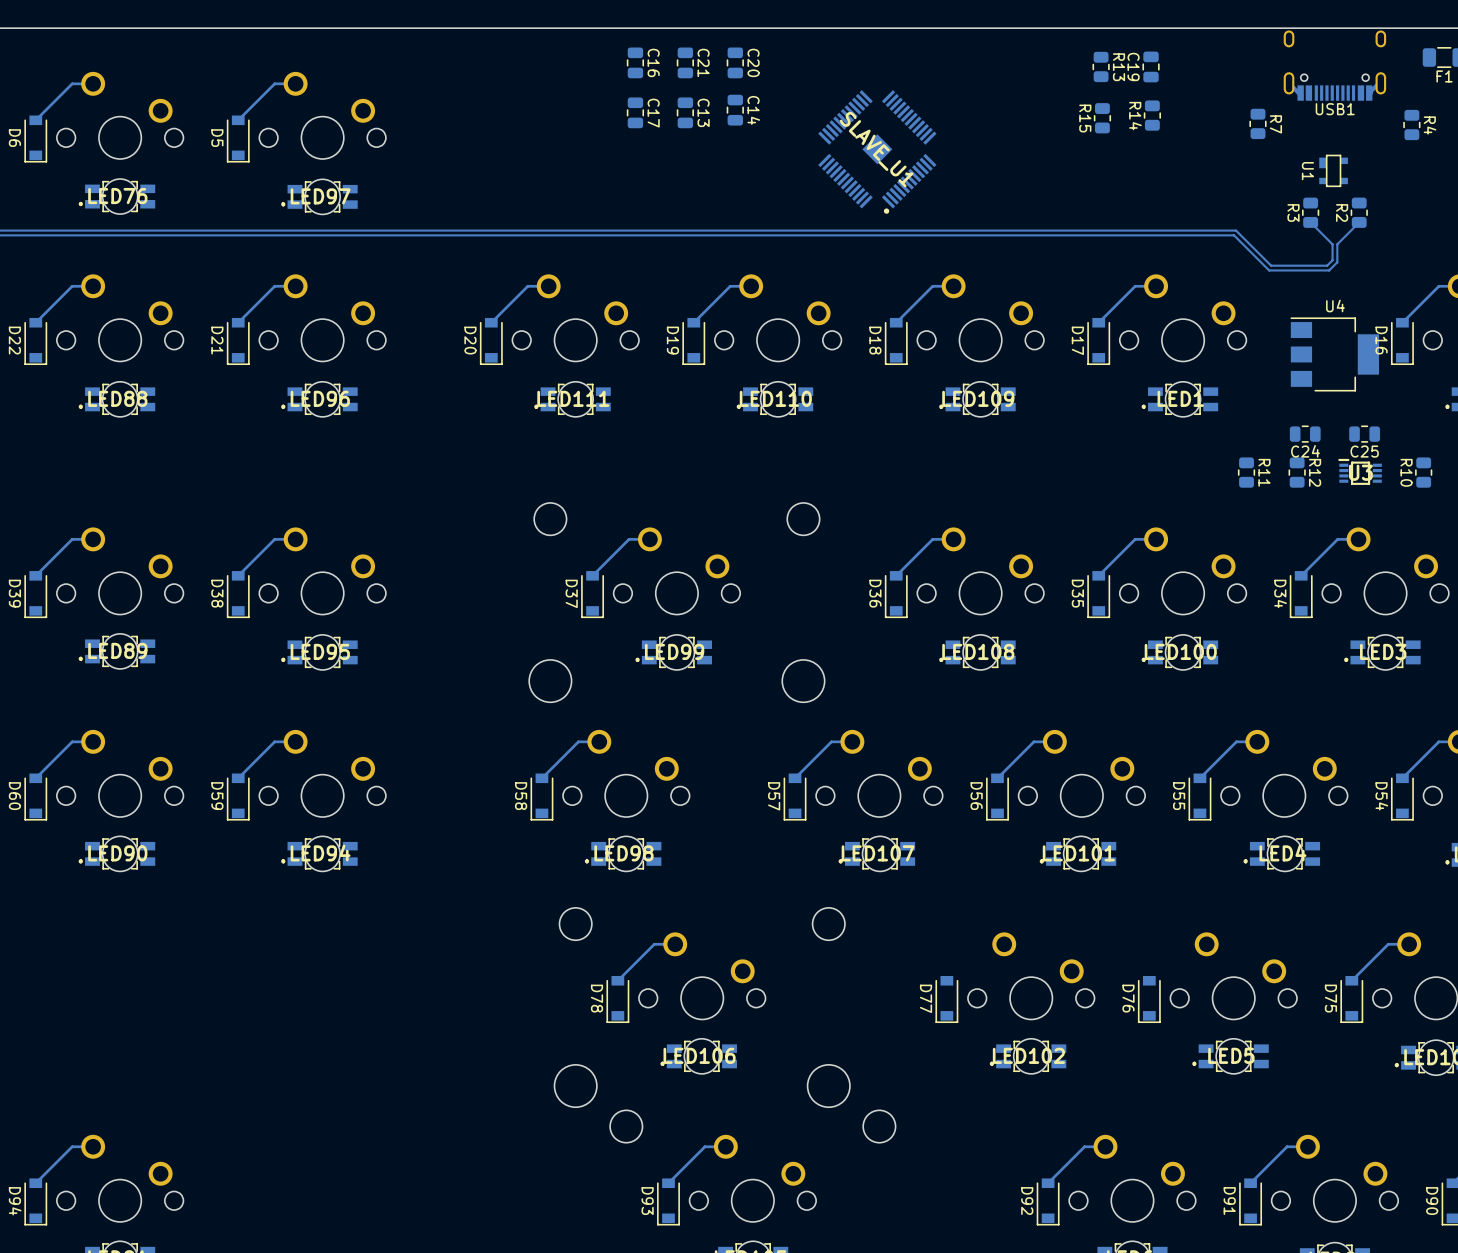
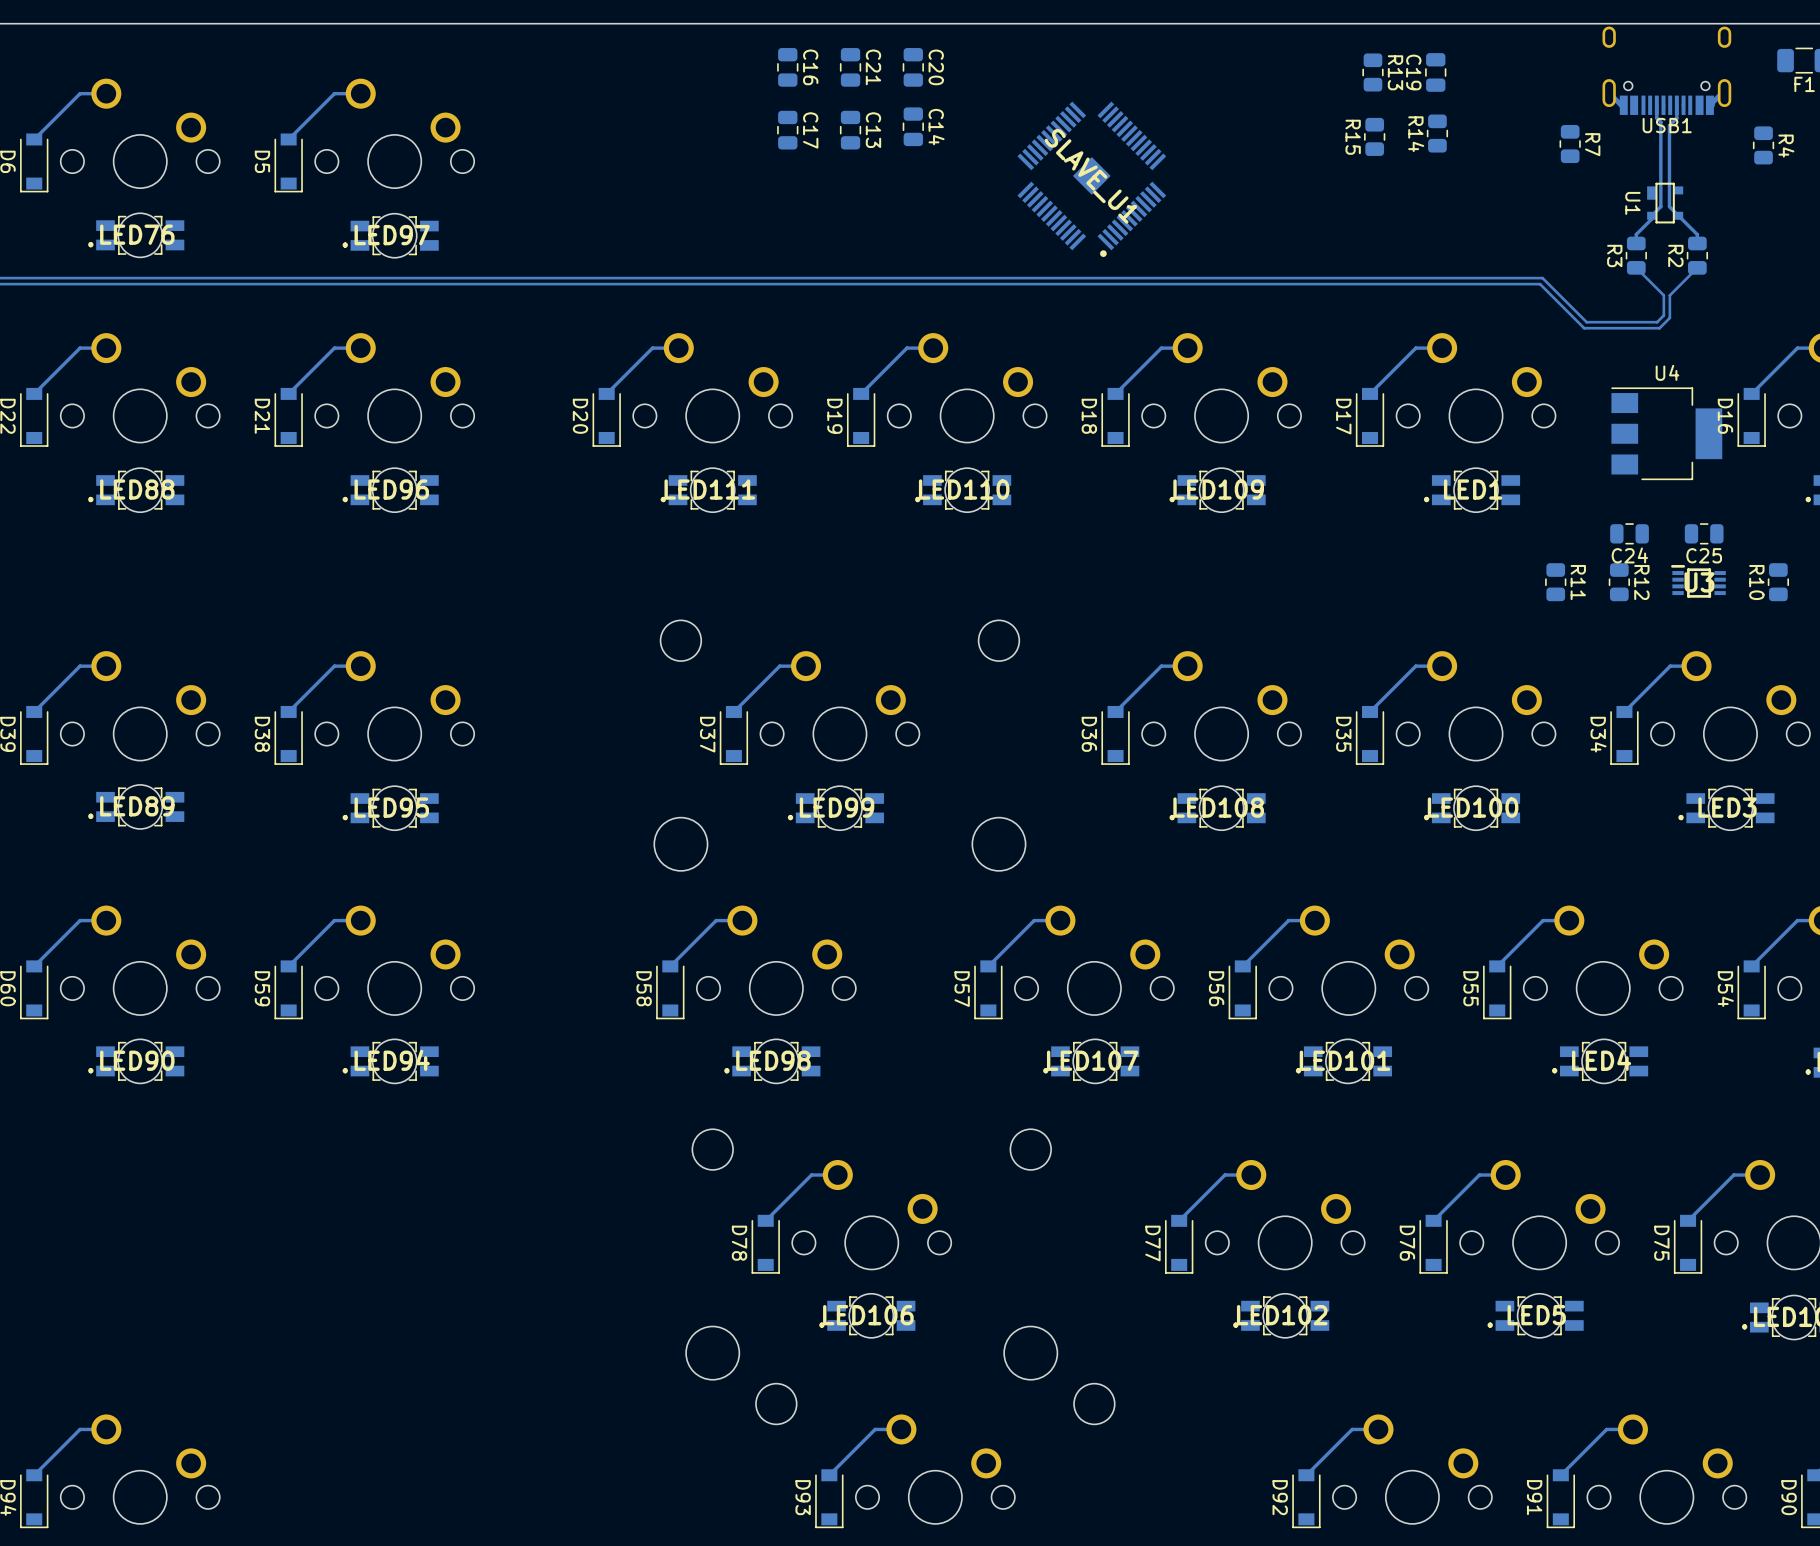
track: none -> (1656, 105) (1656, 118) (1660, 122) (1660, 206) (1636, 234) (1636, 243)
track: none -> (1676, 105) (1676, 118) (1669, 125) (1669, 206) (1697, 234) (1697, 243)
track: none -> (1251, 1175) (1224, 1175) (1179, 1220)
track: none -> (1505, 1175) (1479, 1175) (1433, 1220)

